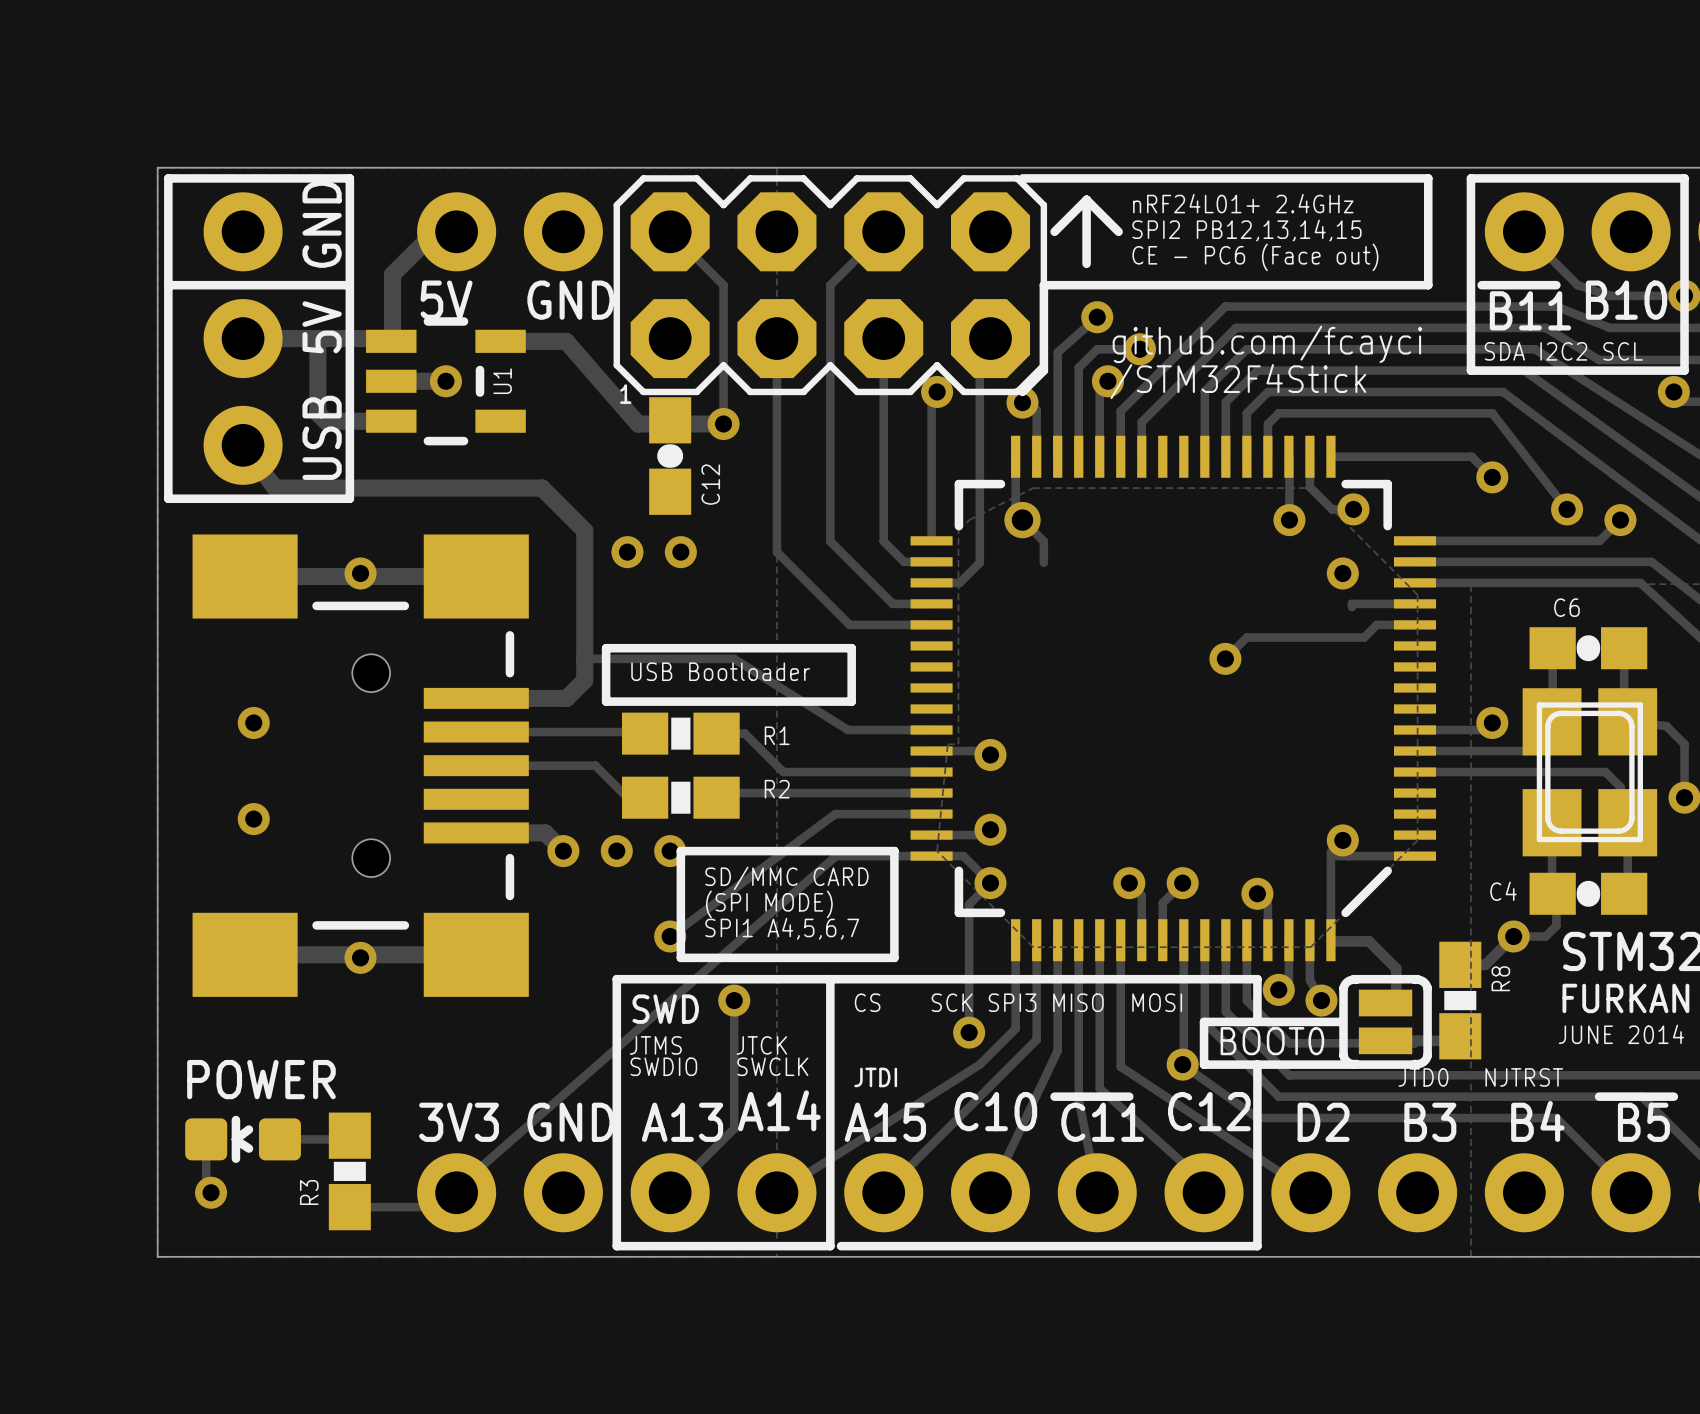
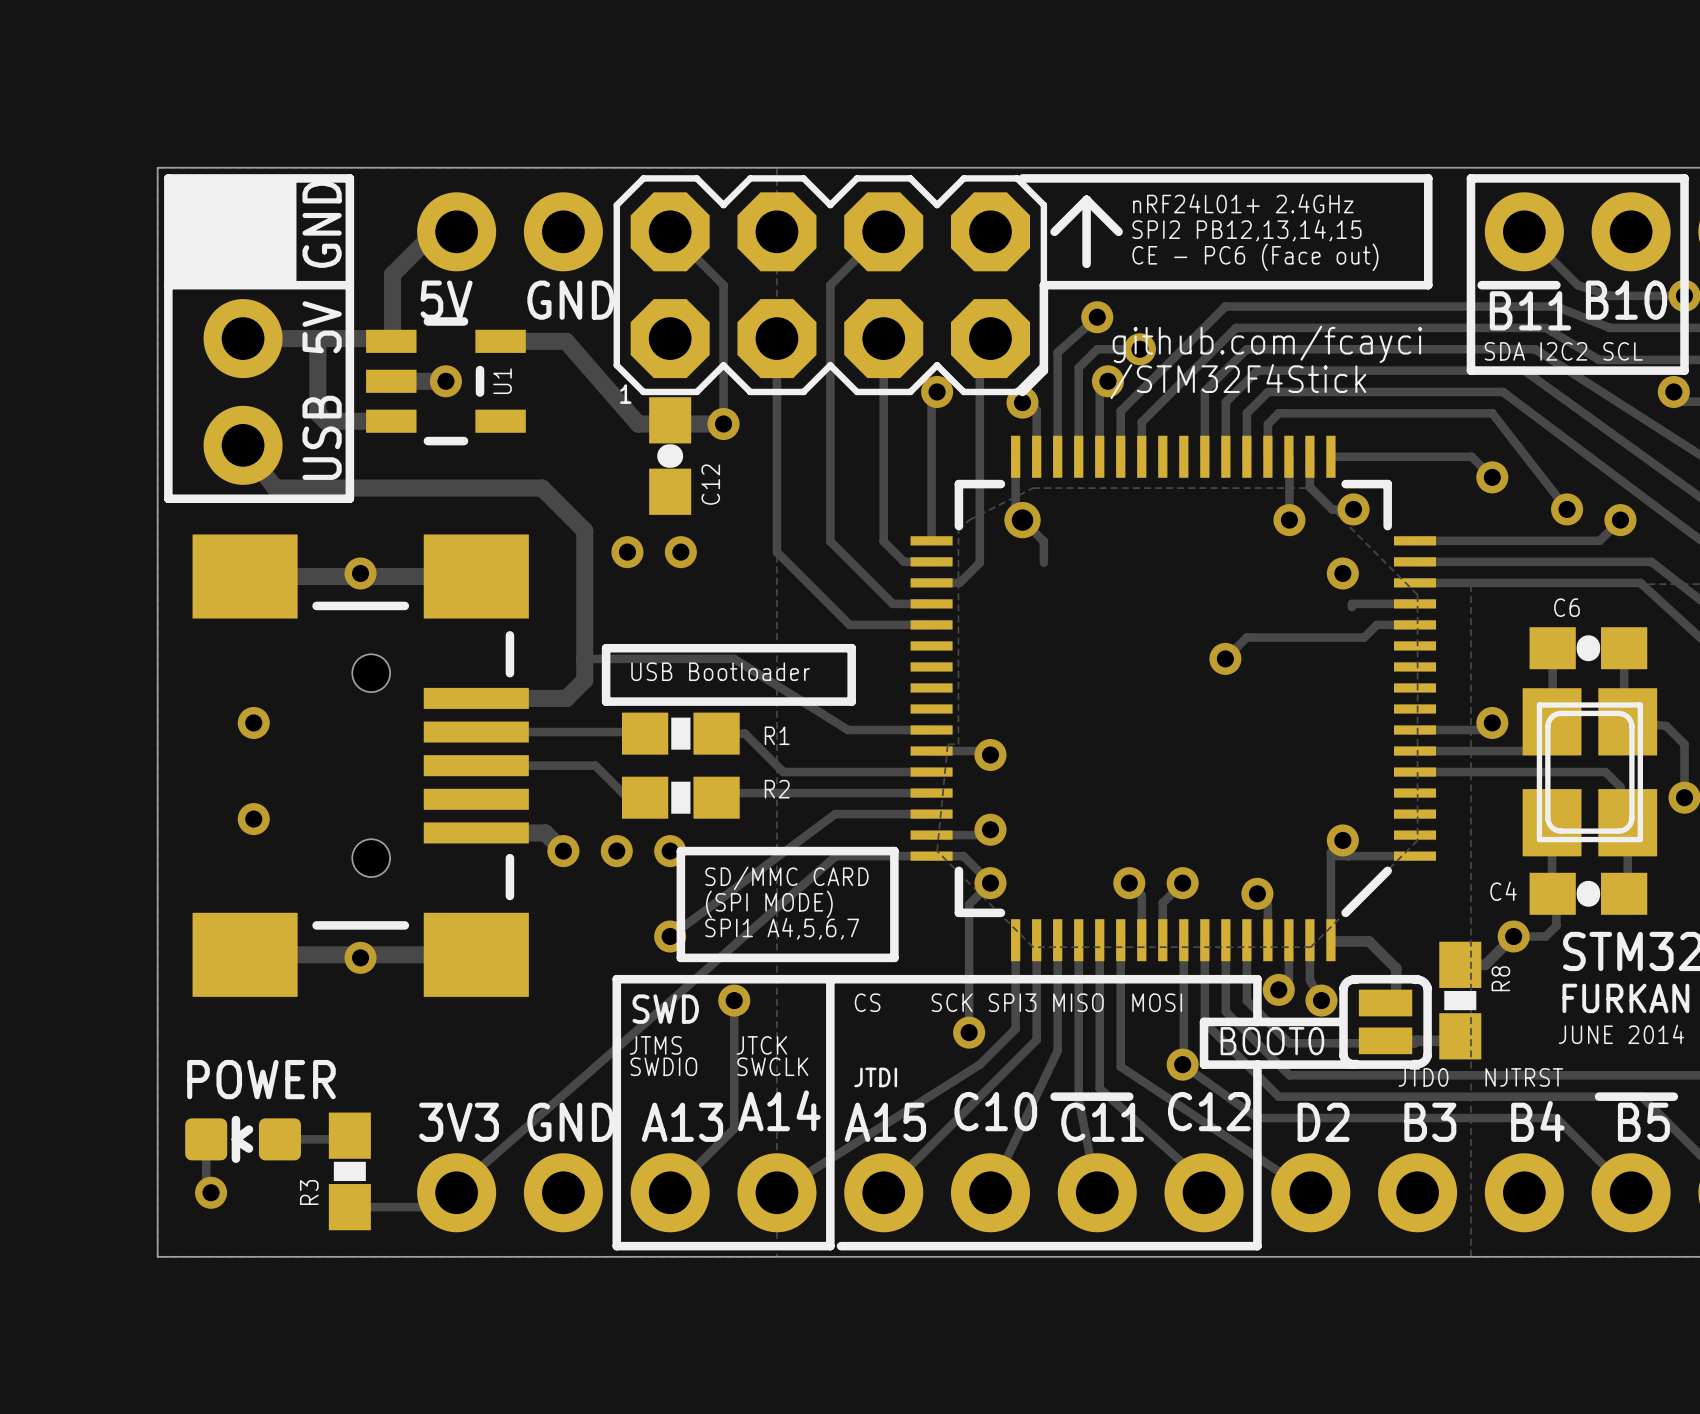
drawing: none -> [168, 178, 297, 286]

